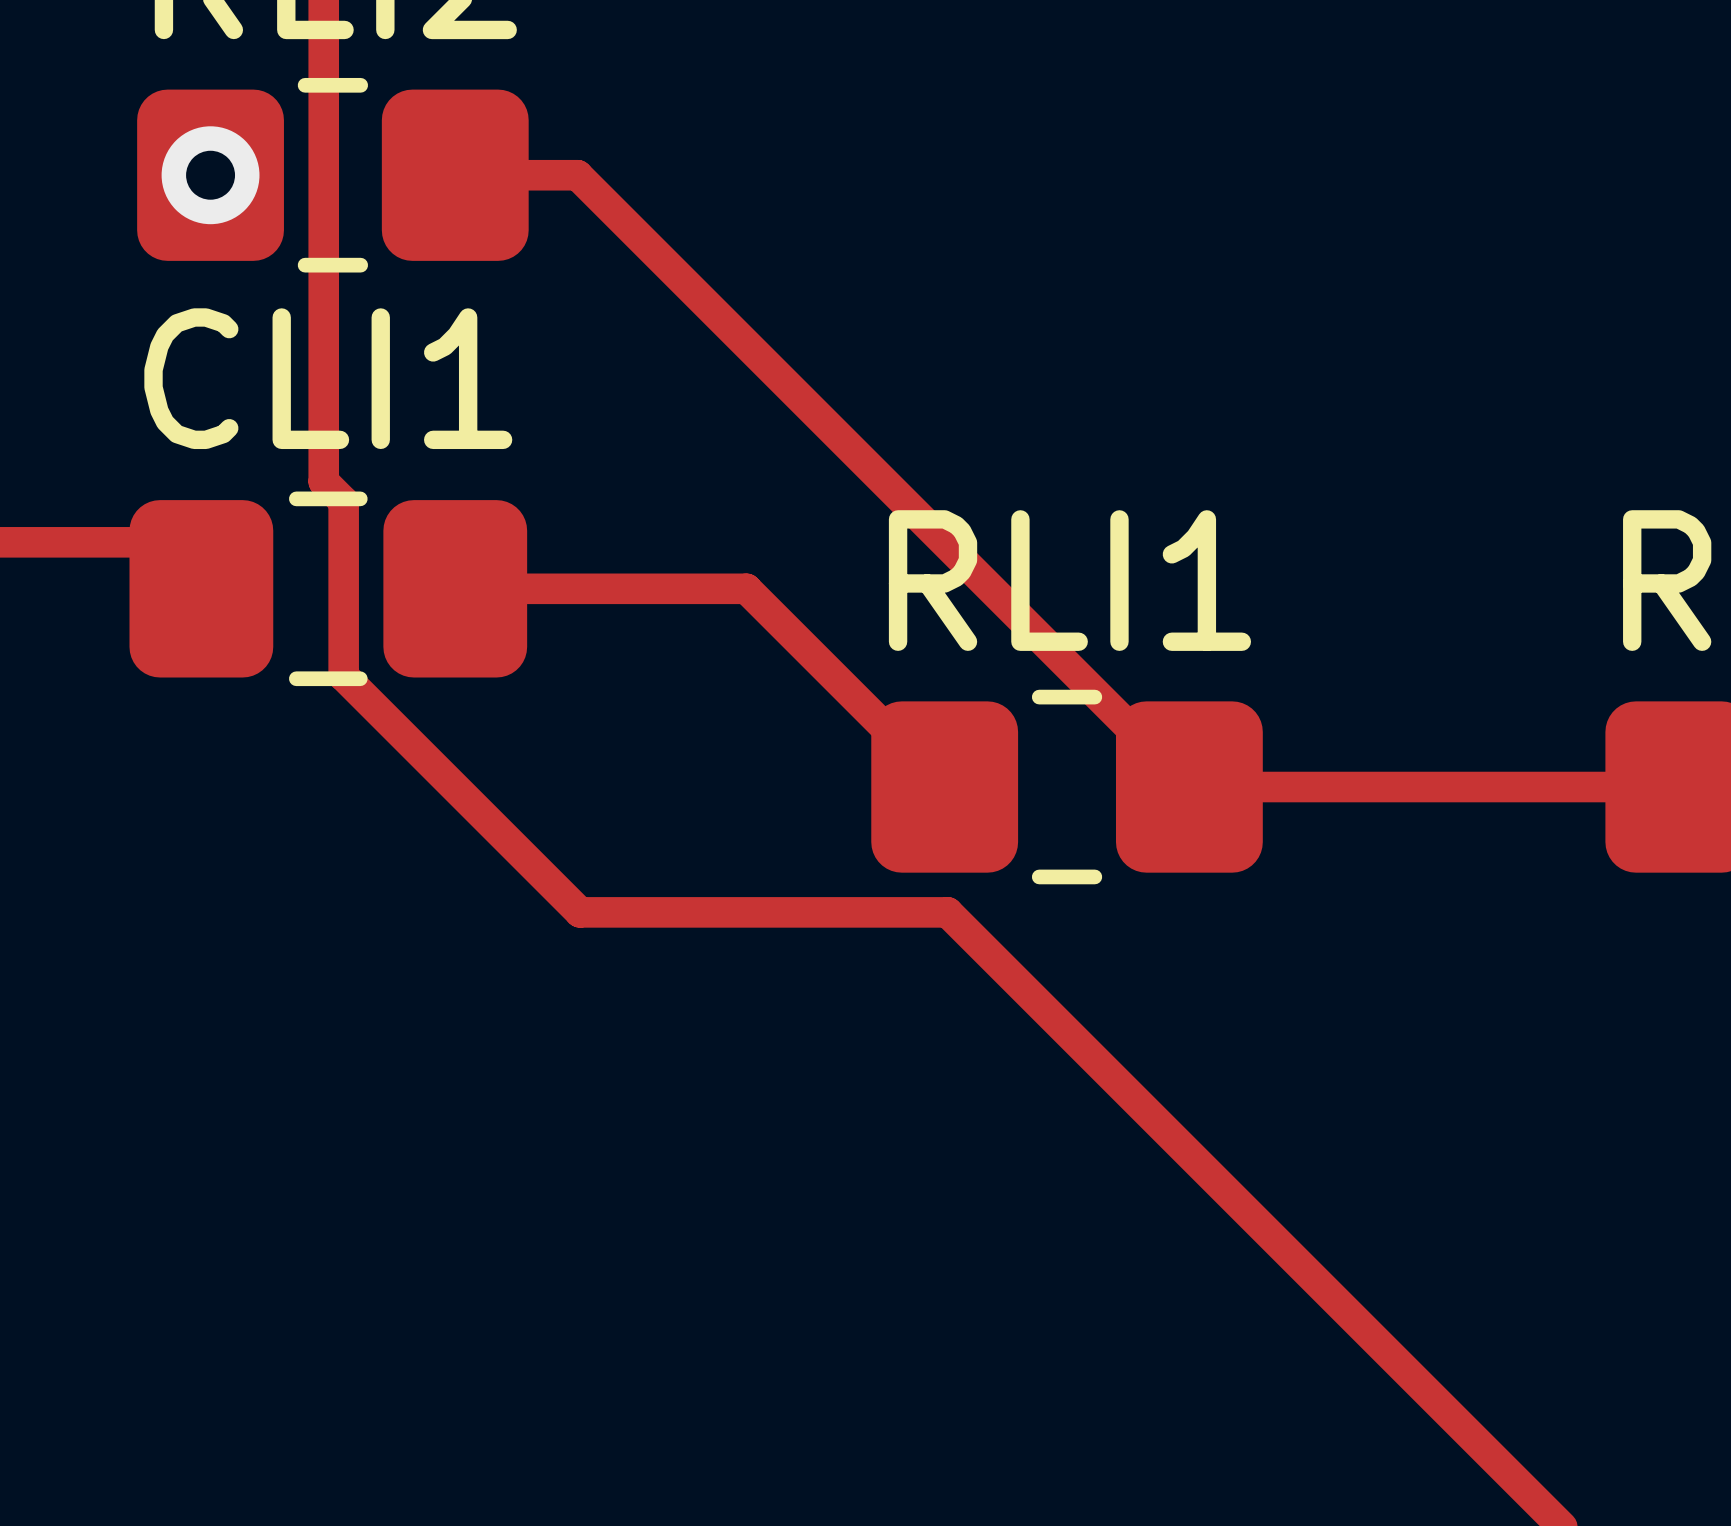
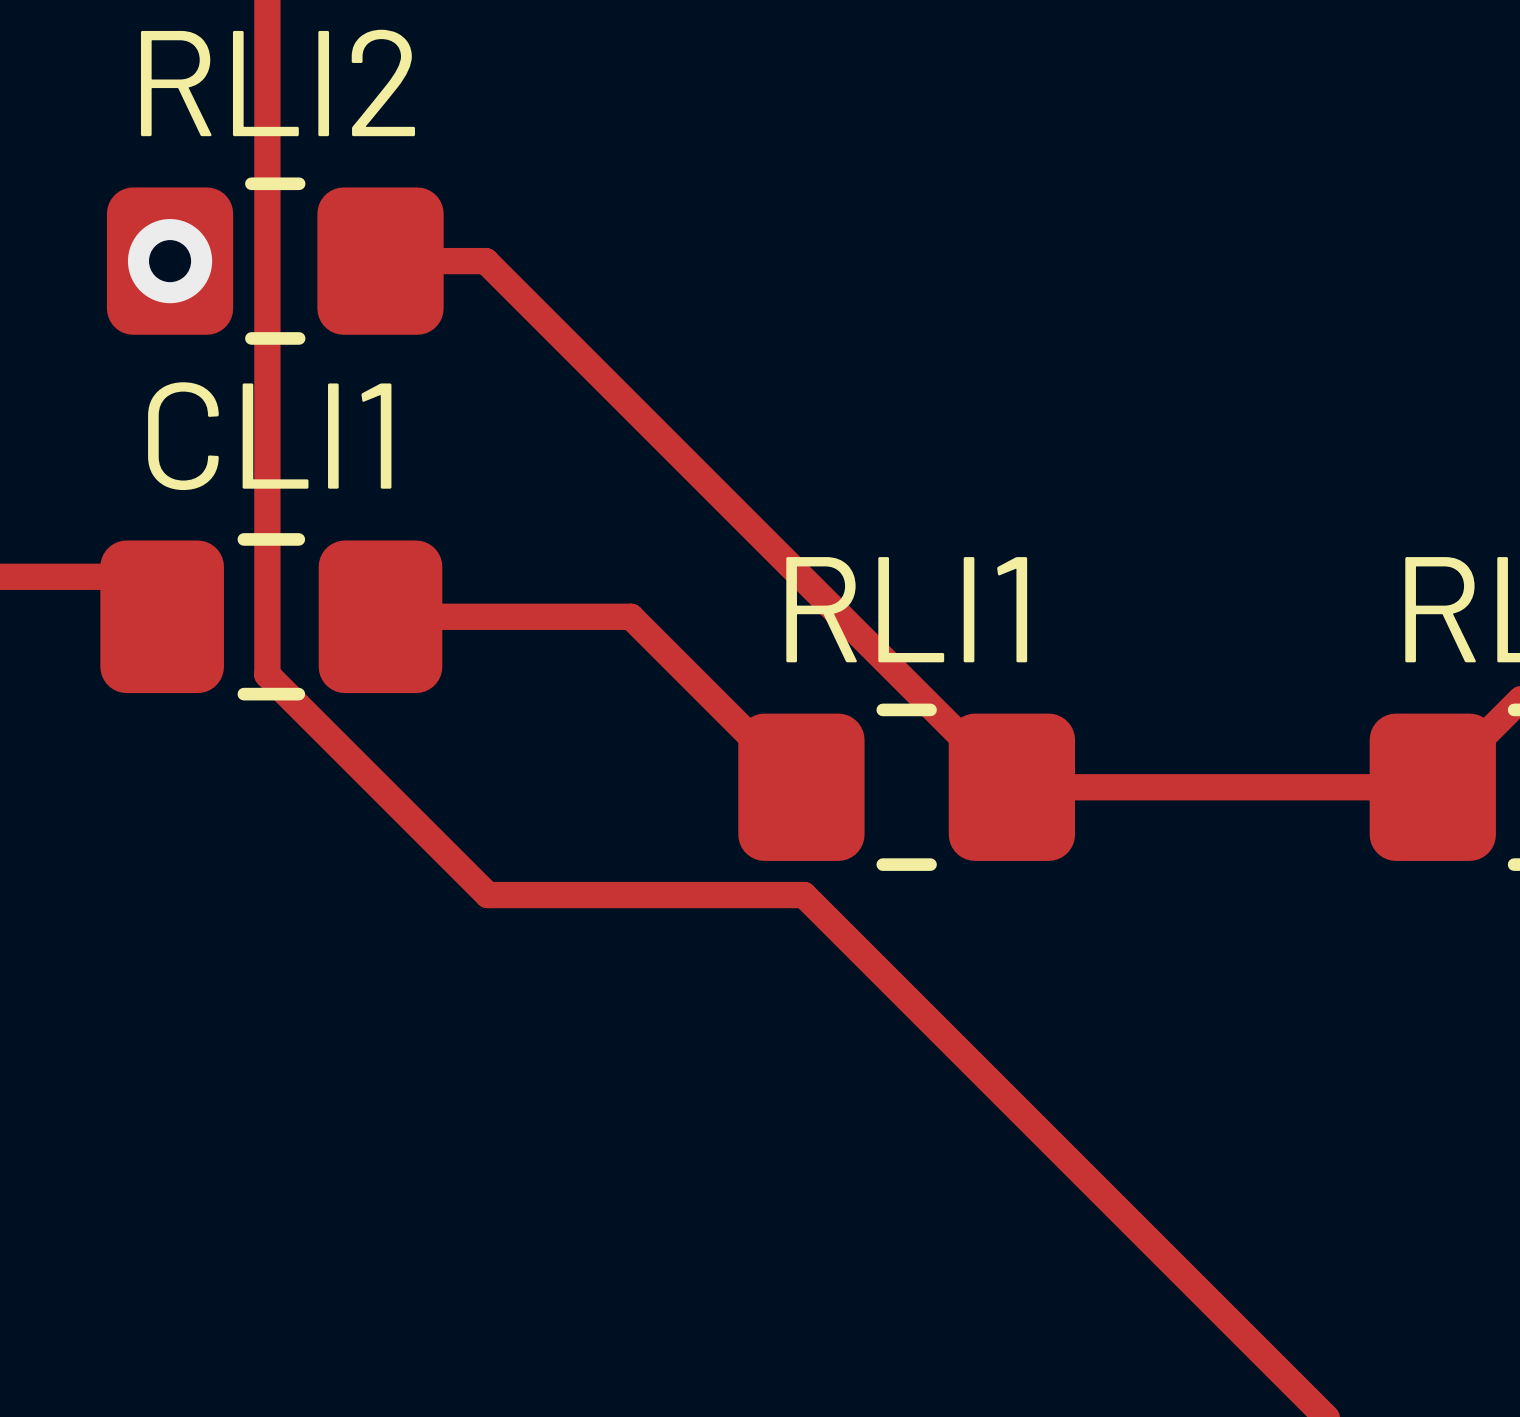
track: (323, 481) (343, 501) (343, 676) (580, 912) -> (267, 524) (267, 674) (487, 895)

